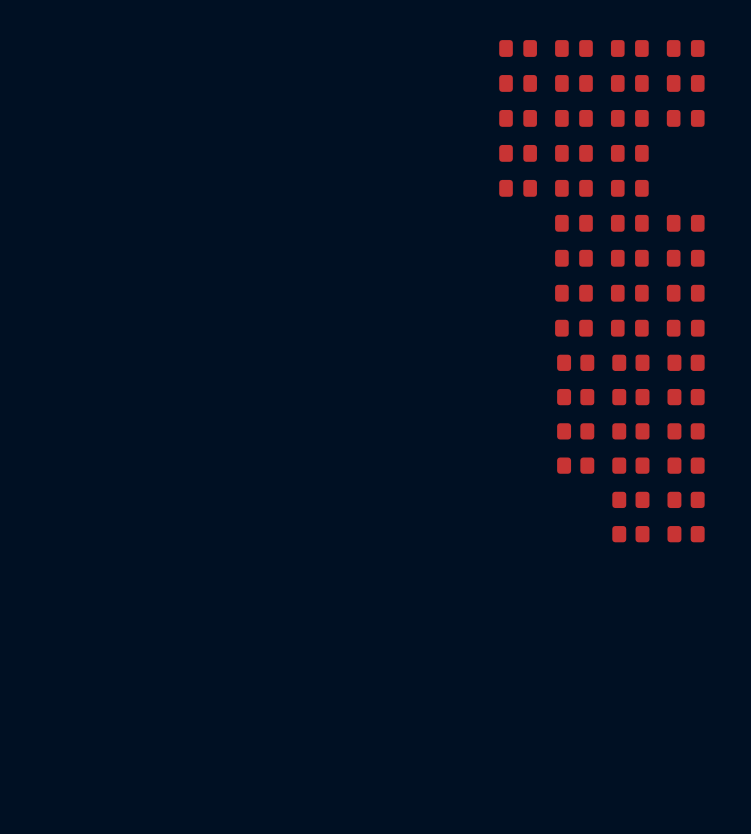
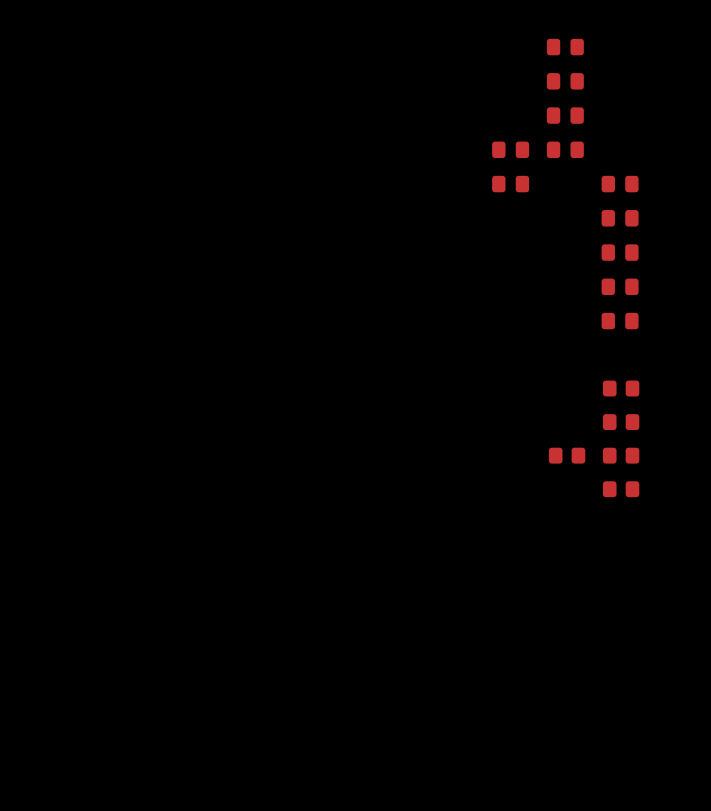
part: (518, 48) -> none
part: (629, 48) -> none
part: (685, 48) -> none
part: (518, 83) -> none
part: (629, 83) -> none
part: (685, 83) -> none
part: (518, 118) -> none
part: (629, 118) -> none
part: (685, 118) -> none
part: (629, 153) -> none
part: (573, 188) -> none
part: (573, 223) -> none
part: (685, 223) -> none
part: (573, 258) -> none
part: (685, 258) -> none
part: (573, 293) -> none
part: (685, 293) -> none
part: (573, 328) -> none
part: (685, 328) -> none
part: (575, 362) -> none
part: (630, 362) -> none
part: (686, 362) -> none
part: (575, 397) -> none
part: (686, 397) -> none
part: (575, 431) -> none
part: (686, 431) -> none
part: (686, 465) -> none
part: (686, 499) -> none
part: (630, 534) -> none
part: (686, 534) -> none

